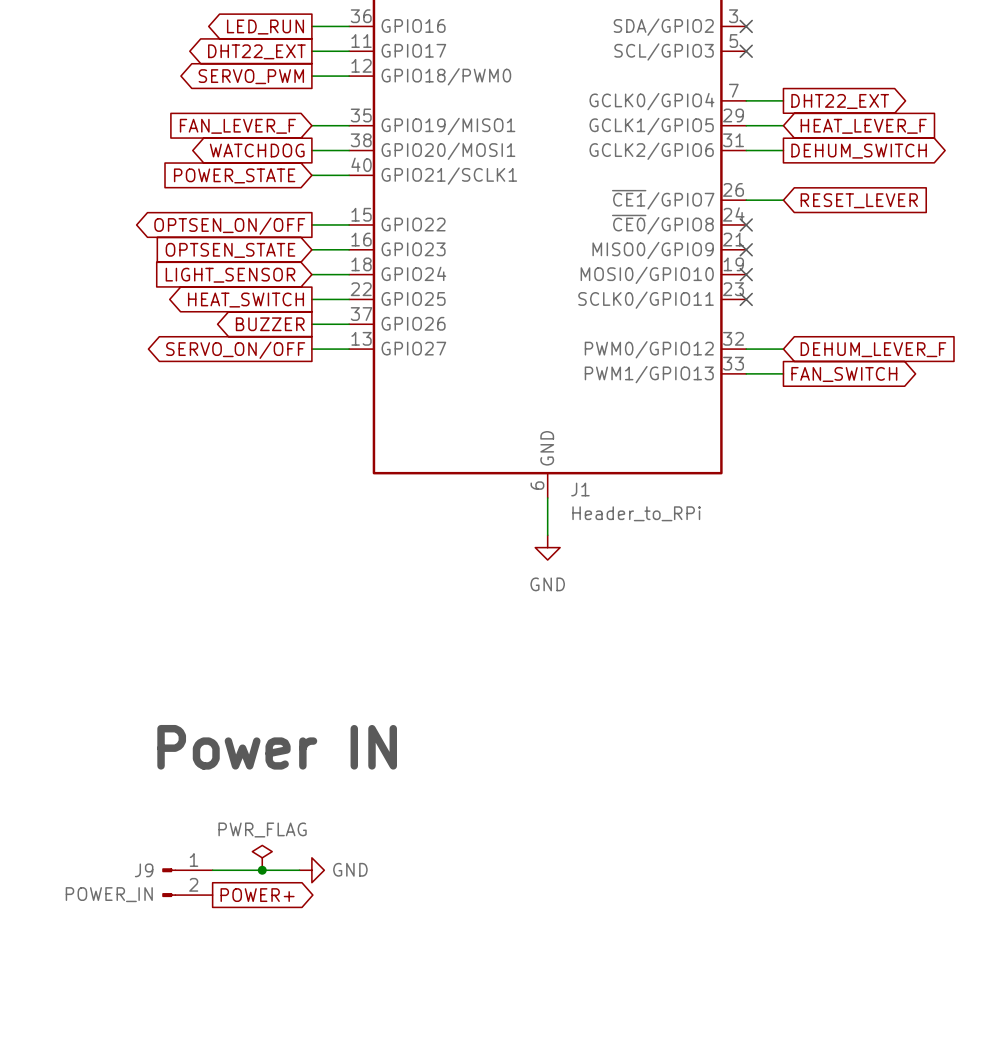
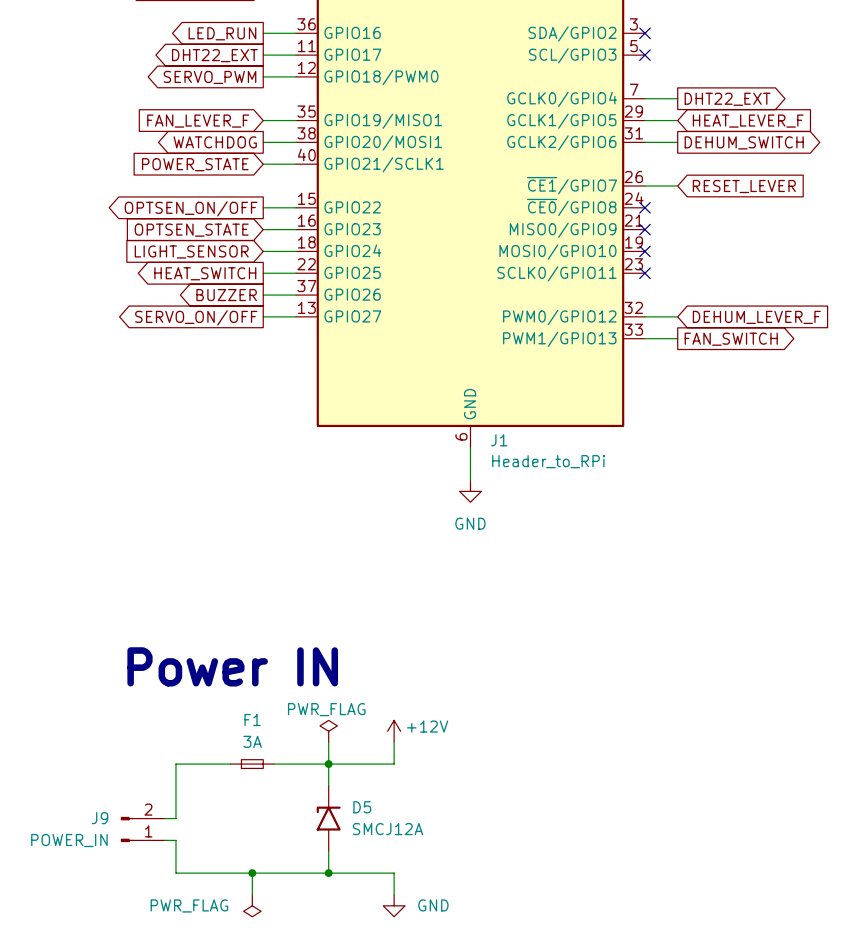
power symbol: none -> PWR_FLAG (328, 731)
power symbol: none -> +12V (394, 731)
wire: none -> (328, 742) (328, 785)
wire: none -> (394, 742) (394, 764) (274, 764)
power symbol: PWR_FLAG (262, 857) -> none
wire: none -> (230, 764) (175, 764) (175, 818) (165, 818)
F1: none -> 3A (252, 764)
junction: none -> (328, 764)
wire: (212, 870) (299, 870) -> none
junction: (262, 870) -> none
power symbol rotation: 0° (311, 870) -> 90° clockwise (394, 905)
power symbol position: GND (311, 870) -> GND (394, 905)
J9 flip: as is (169, 882) -> up-down (126, 829)
J9 position: (187, 882) -> (142, 829)
global label: POWER+ (257, 895) -> none
D5: none -> SMCJ12A (328, 818)
wire: none -> (165, 840) (175, 840) (175, 873) (394, 873) (394, 894)
wire: none -> (328, 851) (328, 873)
wire: none -> (252, 873) (252, 894)
junction: none -> (252, 873)
junction: none -> (328, 873)
power symbol: none -> PWR_FLAG (252, 905)

